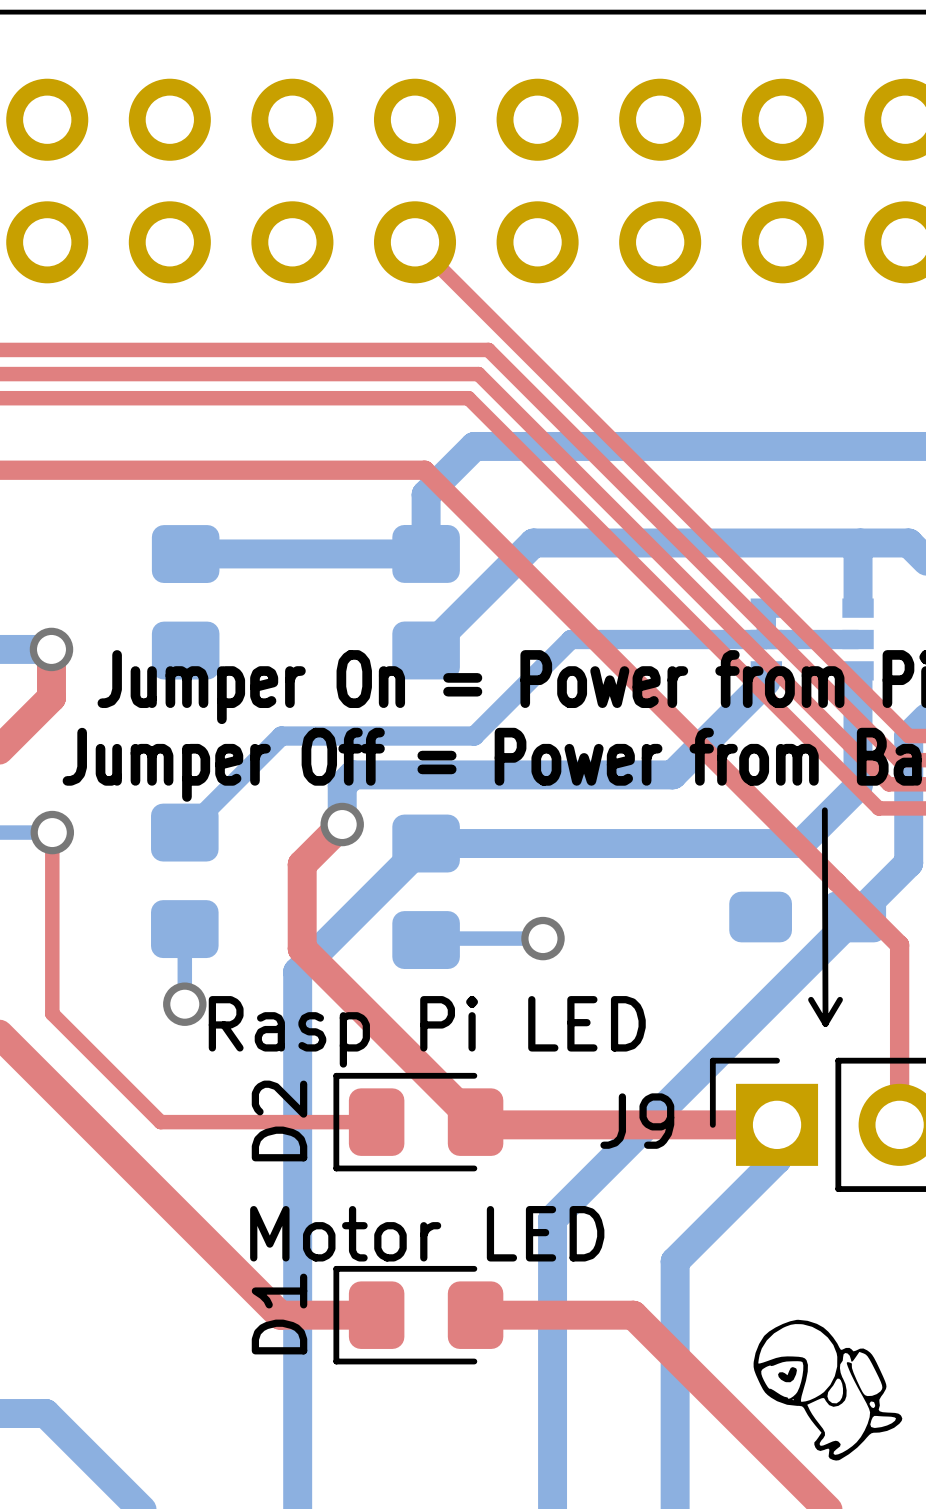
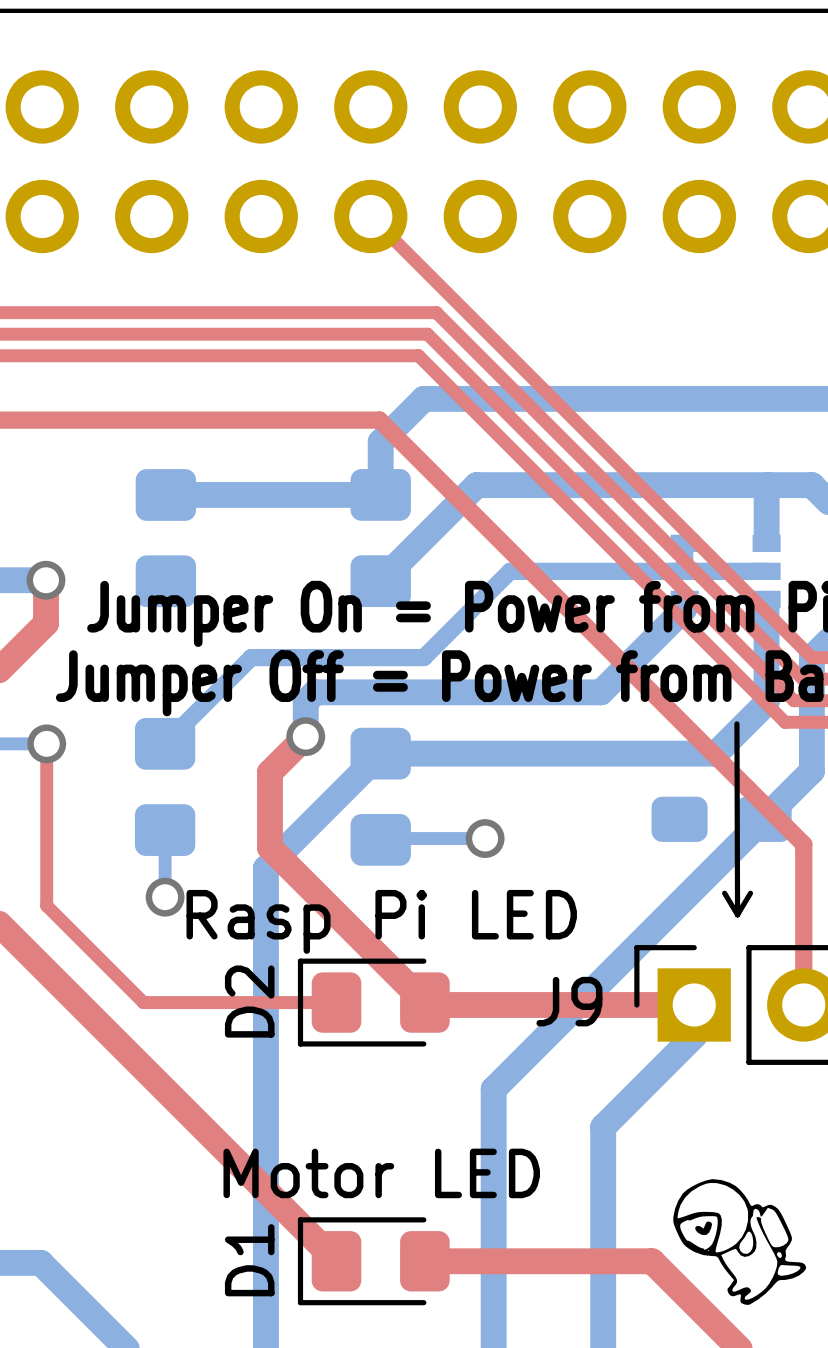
text position: Motor LED (427, 1233) -> Motor LED (381, 1173)
top track: (280, 1315) (376, 1315) -> (250, 1175) (336, 1261)
D1 position: (418, 1315) -> (373, 1261)
top track: (475, 1315) (633, 1315) (729, 1411) -> (424, 1261) (652, 1261)

